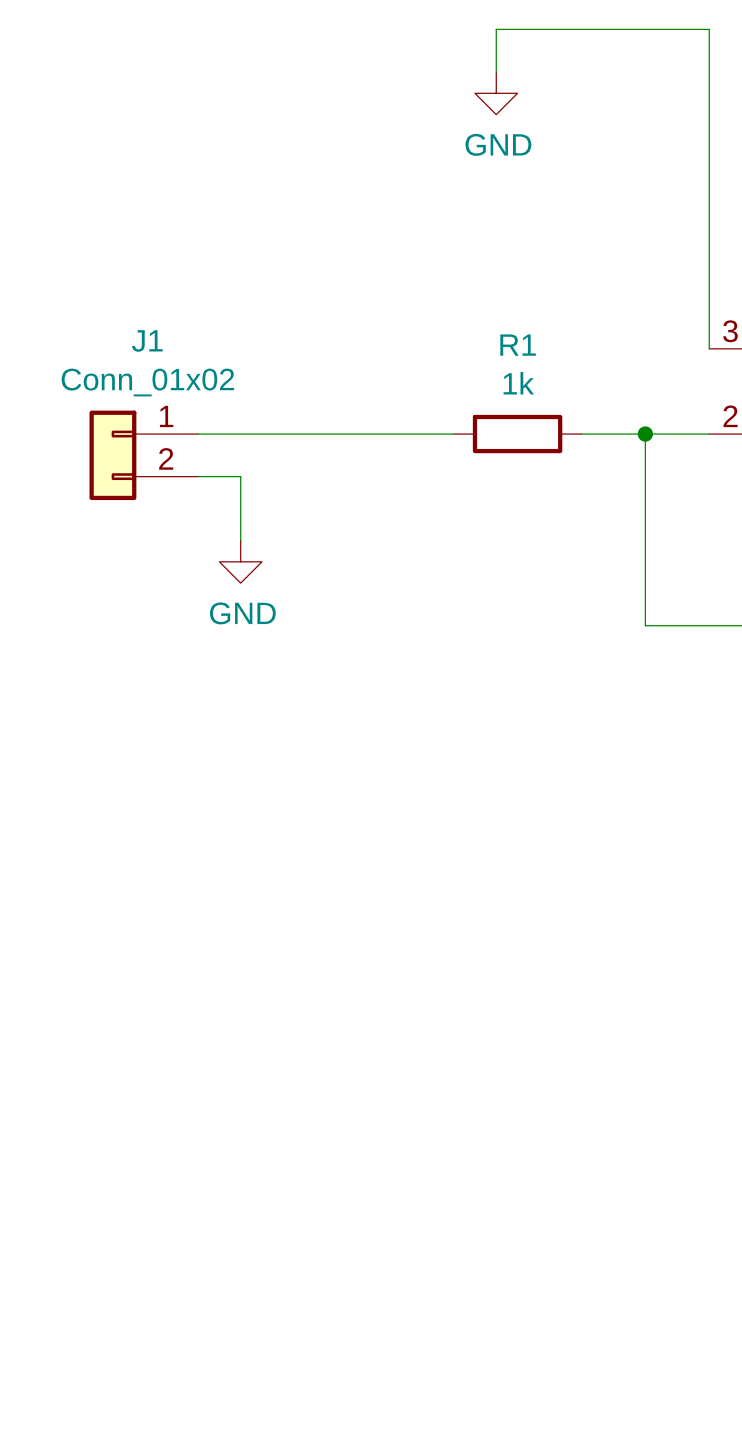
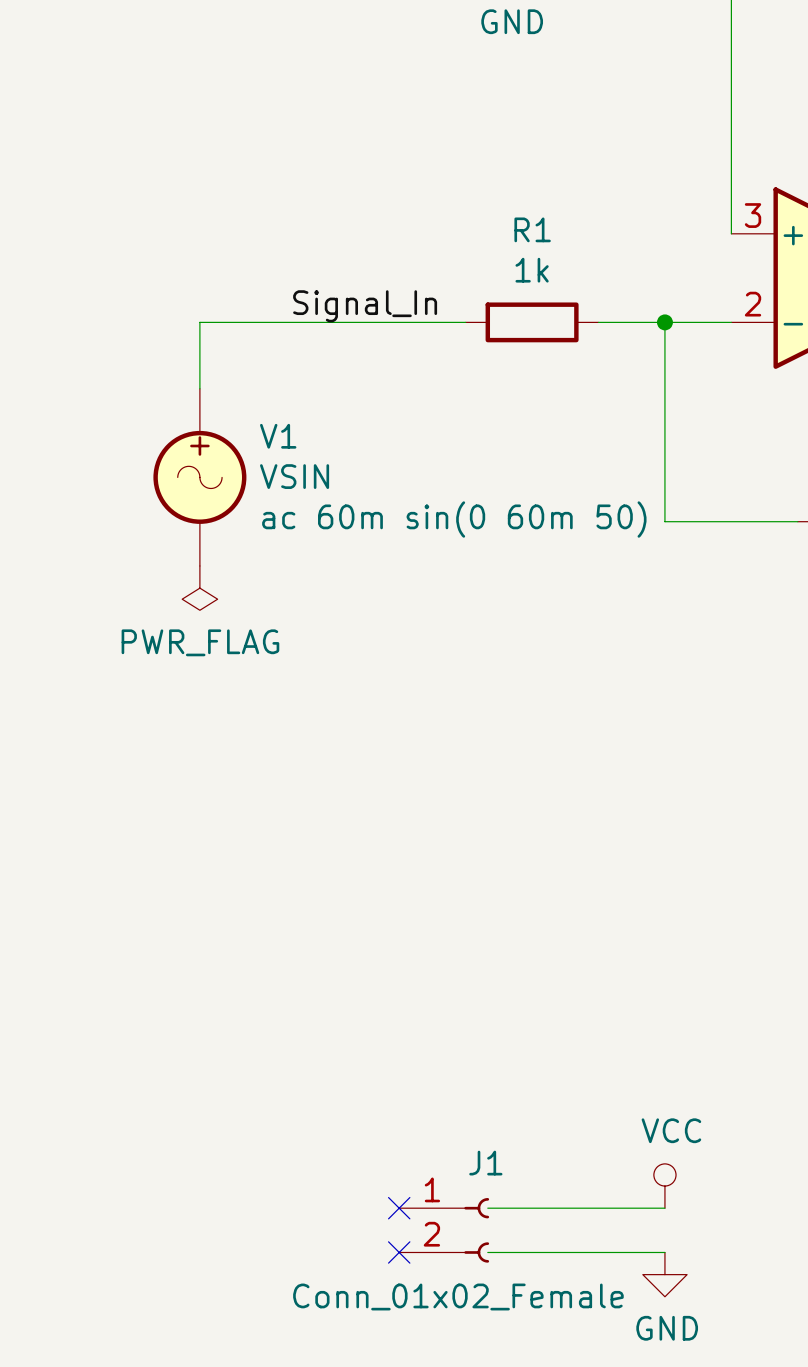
J1 name position: J1 (147, 340) -> J1 (485, 1163)
J1 value: Conn_01x02 (147, 382) -> Conn_01x02_Female (458, 1297)
J1 symbol: [89, 410, 199, 501] -> [399, 1198, 490, 1263]
label: none -> Signal_In (365, 306)
wire: none -> (199, 322) (199, 388)
wire: (198, 476) (240, 476) (240, 540) -> none
power symbol: GND (240, 561) -> none
V1: none -> VSIN (199, 477)
power symbol: none -> PWR_FLAG (199, 588)
power symbol: none -> VCC (664, 1186)
no-connect mark: none -> (399, 1208)
wire: none -> (487, 1208) (664, 1208)
no-connect mark: none -> (399, 1252)
wire: none -> (487, 1252) (664, 1252)
power symbol: none -> GND (664, 1274)

